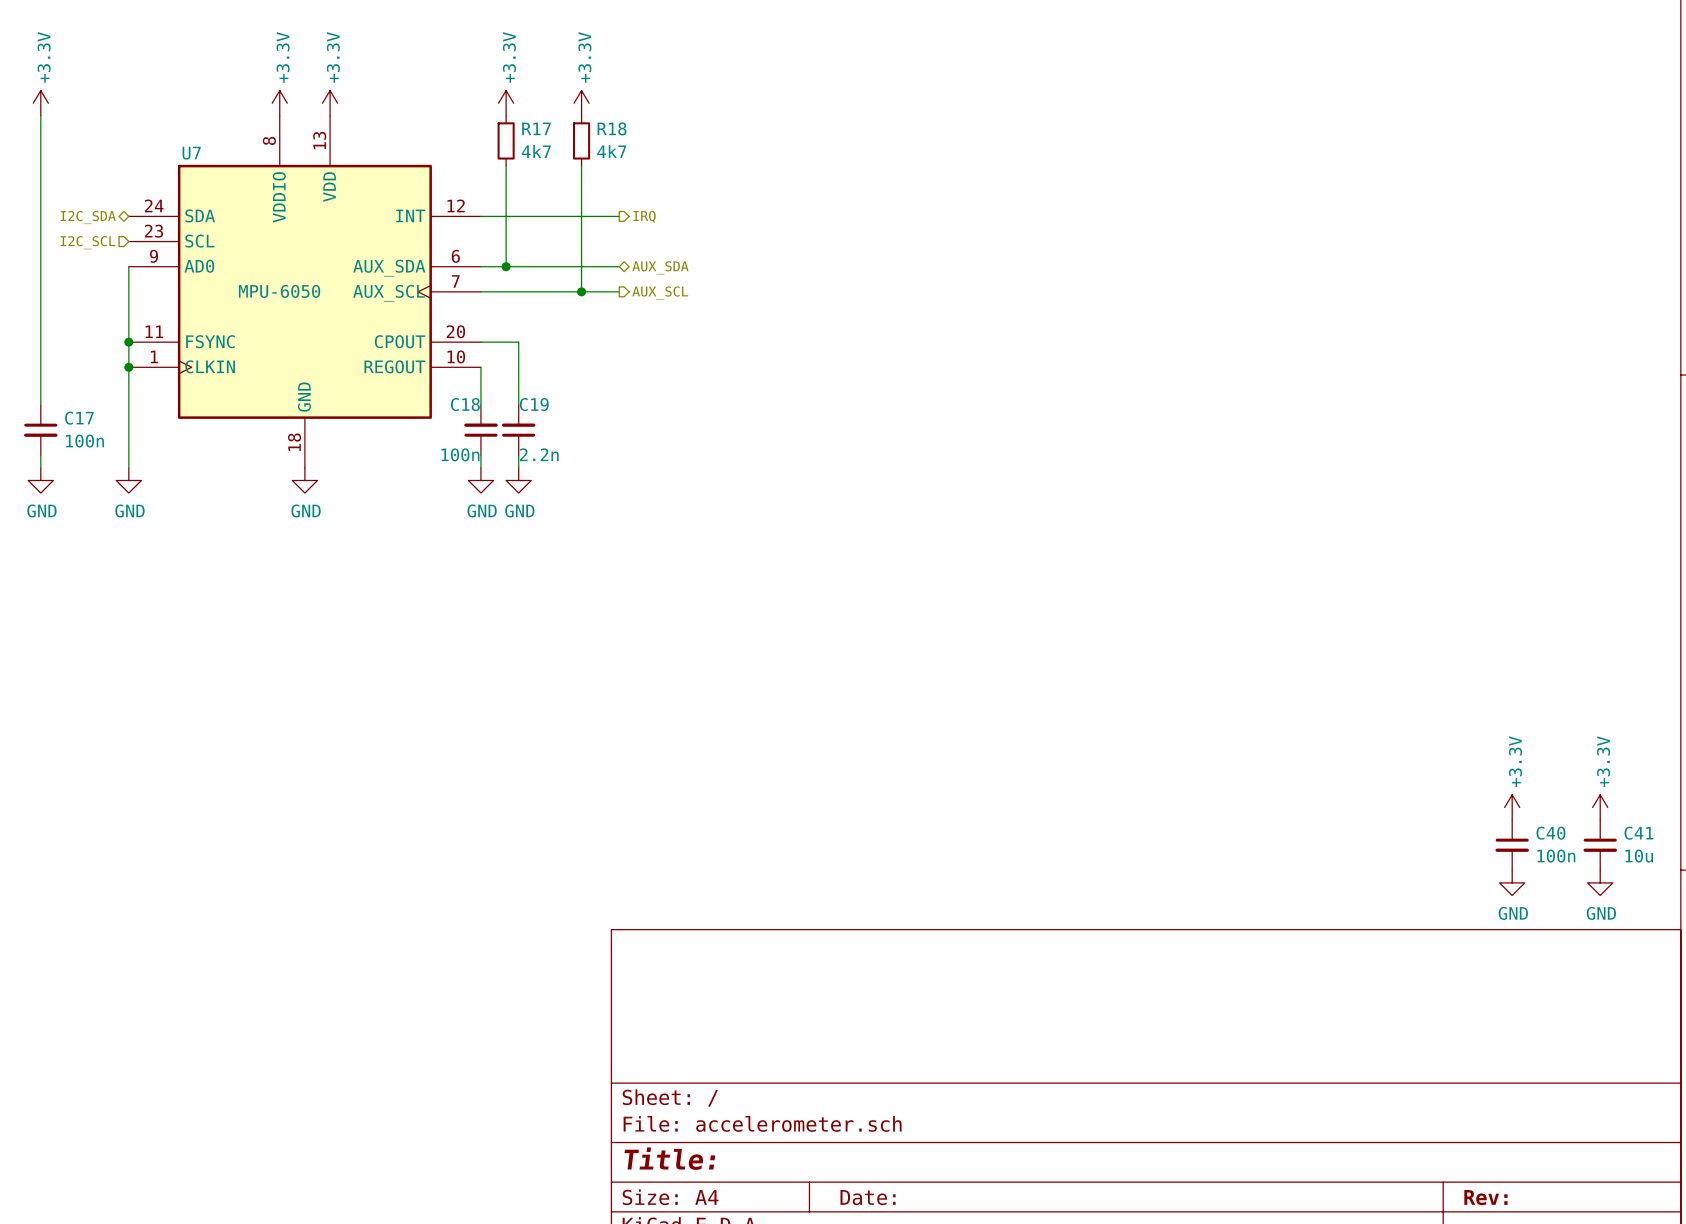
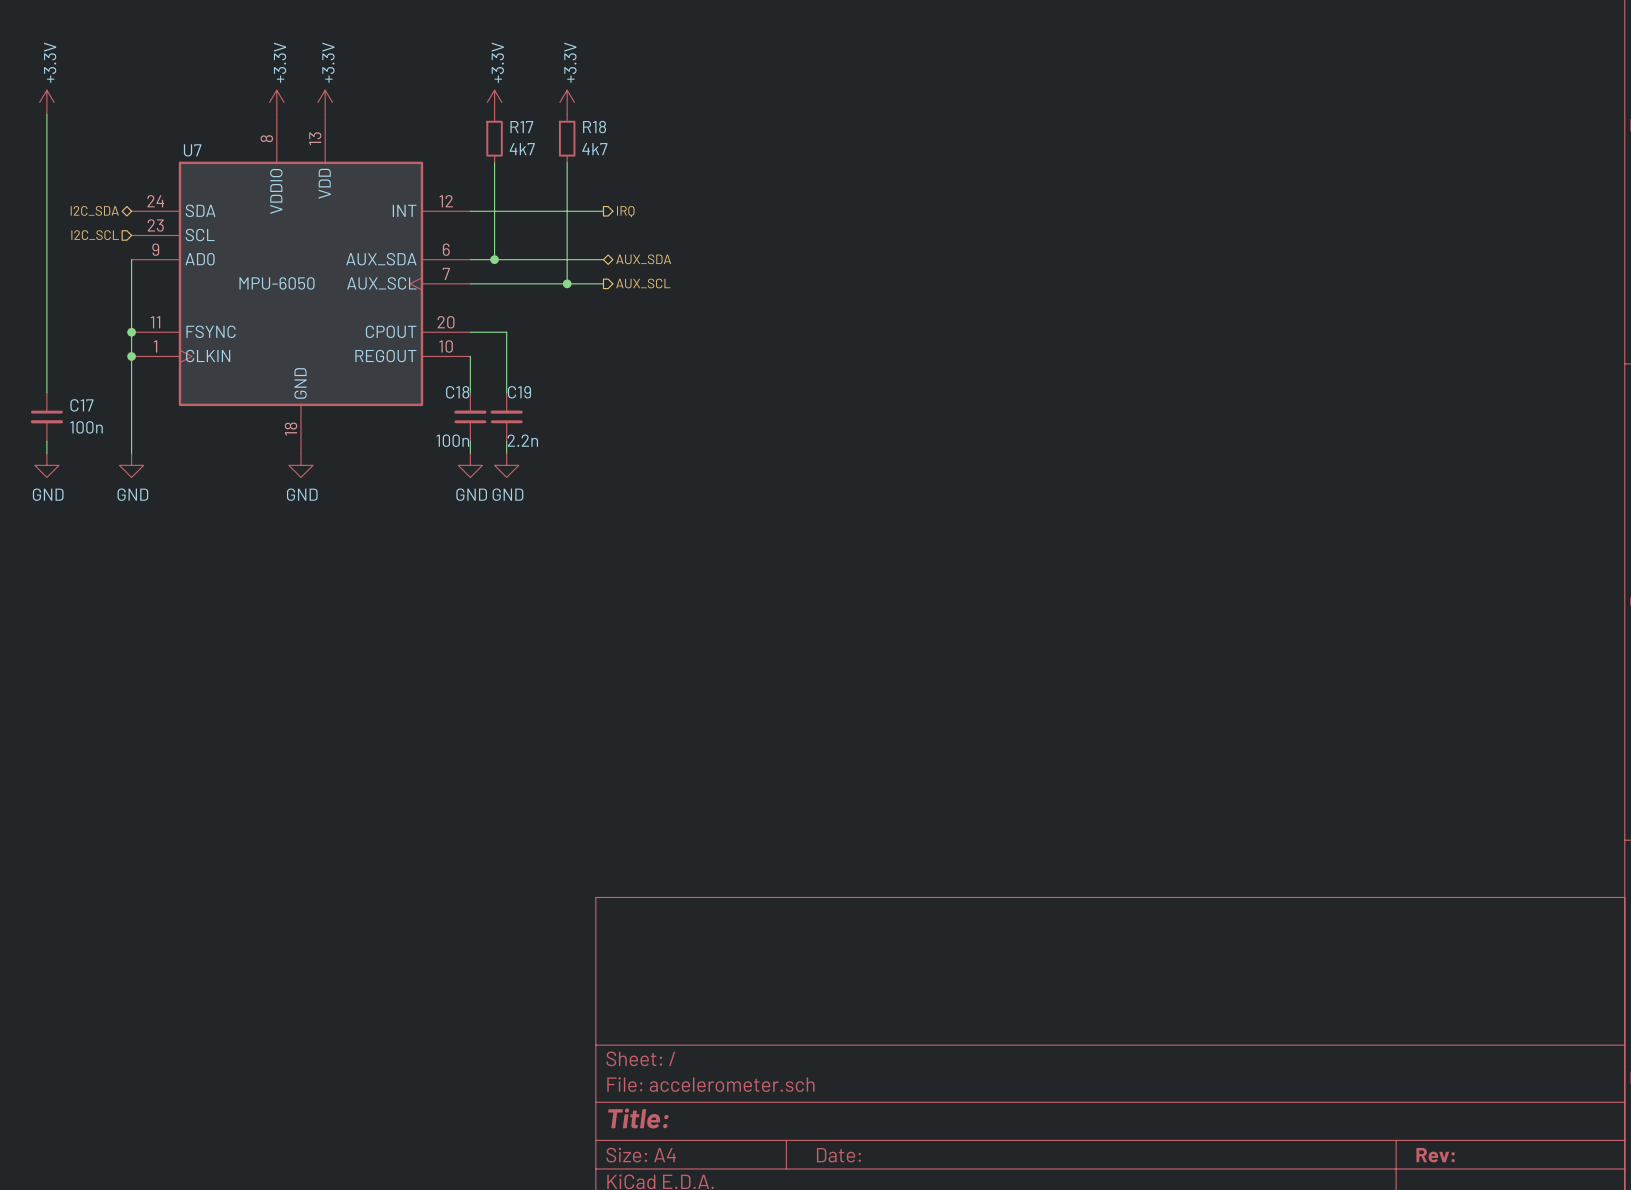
power symbol: +3.3V (1512, 807) -> none
power symbol: +3.3V (1600, 807) -> none
C40: 100n (1512, 845) -> none
C41: 10u (1600, 845) -> none
power symbol: GND (1512, 882) -> none
power symbol: GND (1600, 882) -> none

